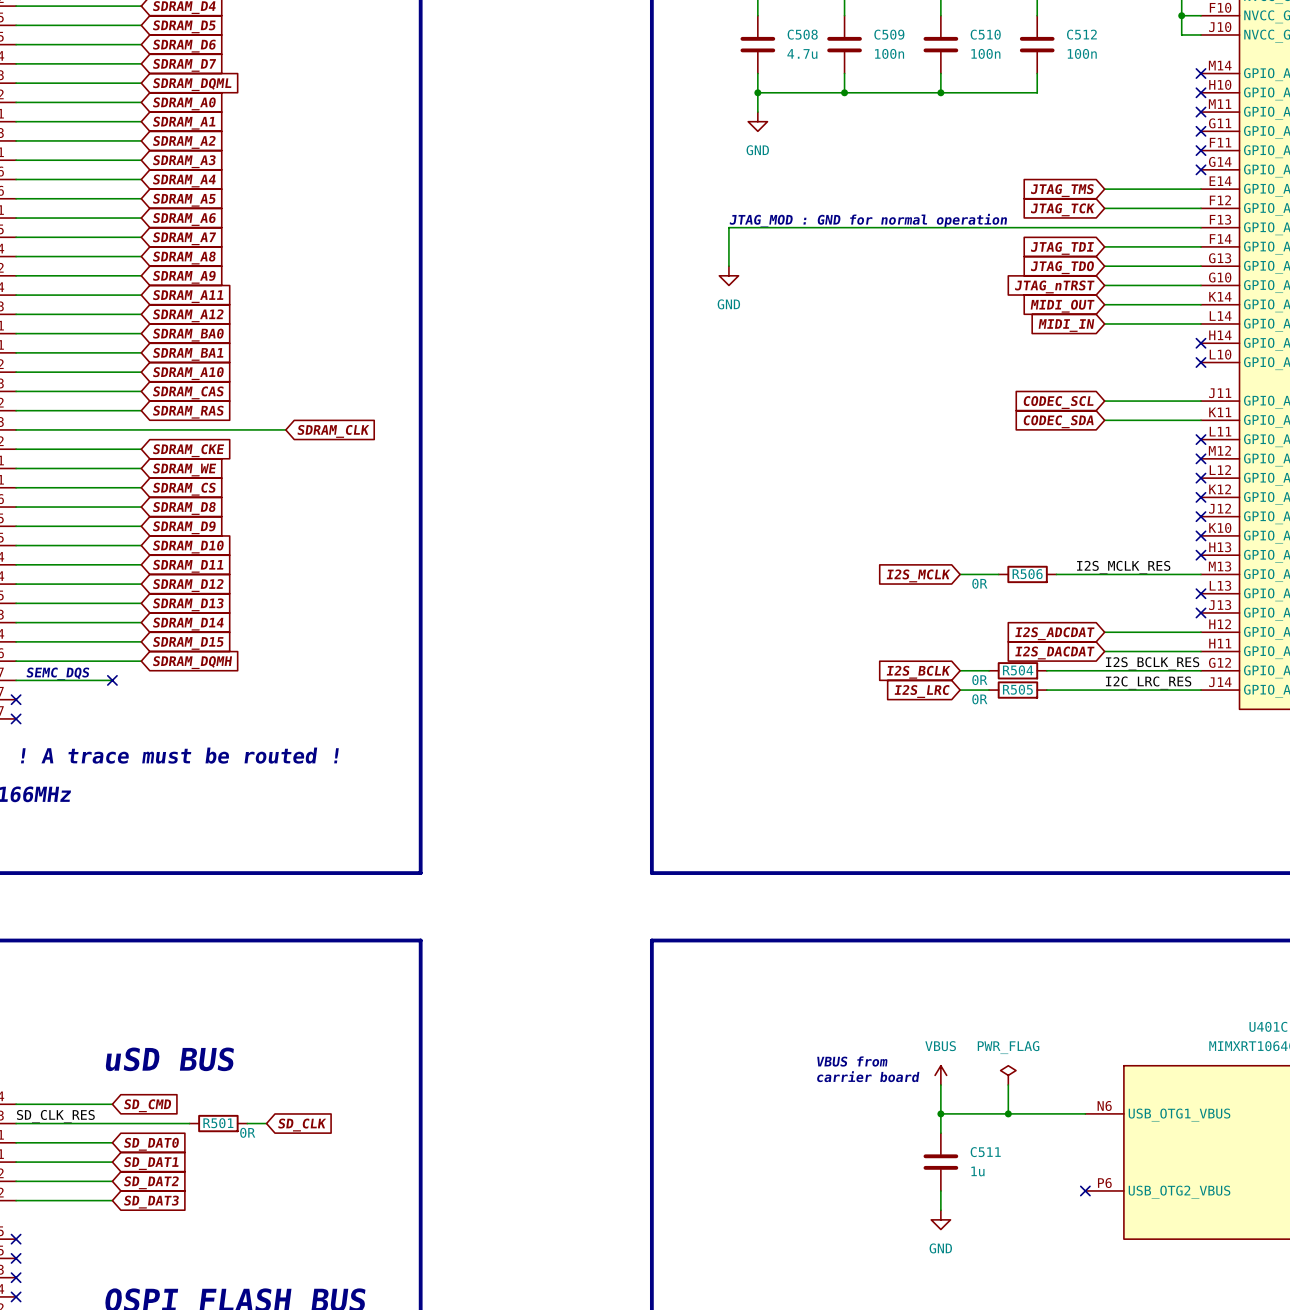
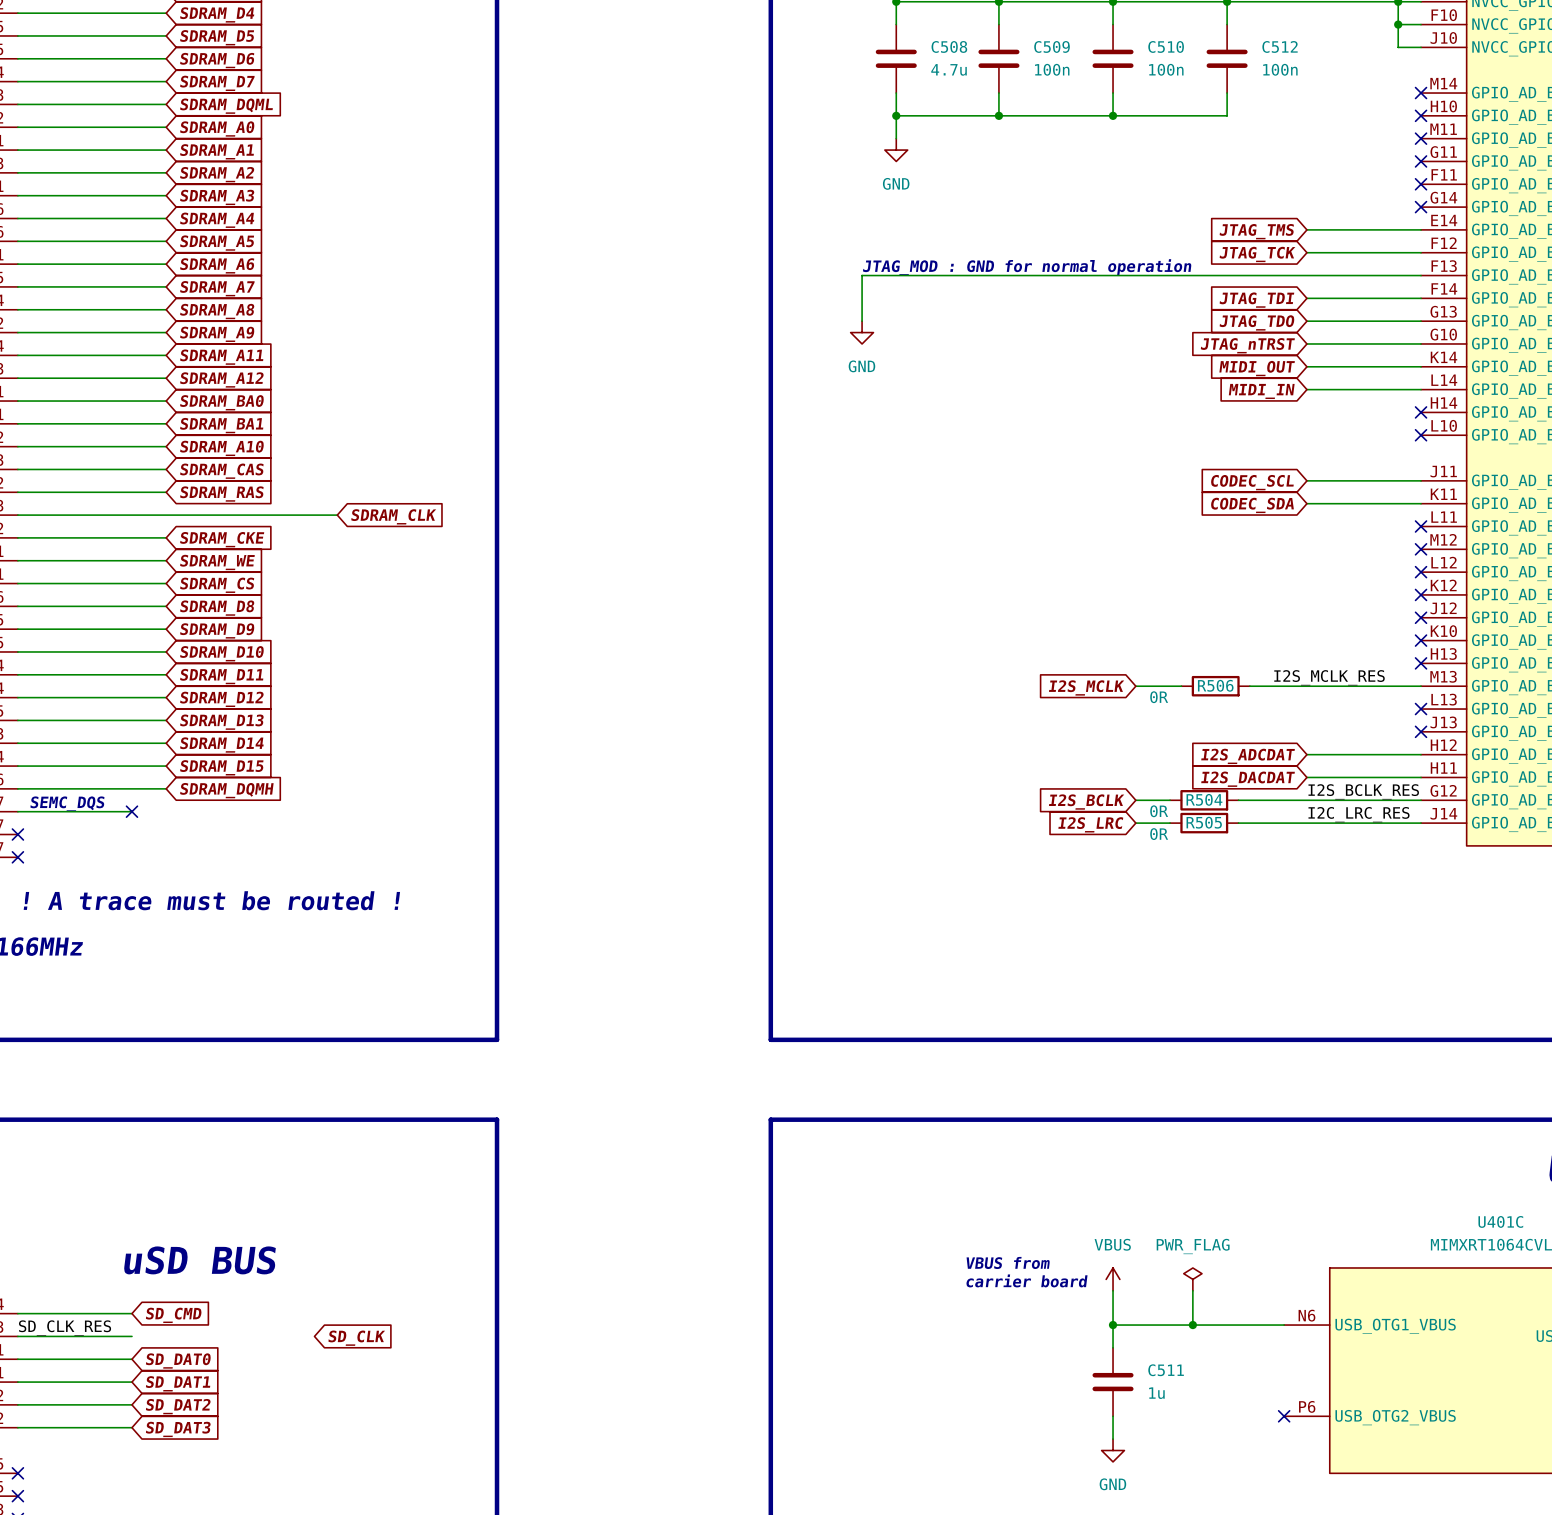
wire: (112, 1123) (189, 1123) -> none
R501: 0R (218, 1123) -> none
wire: (247, 1123) (266, 1123) -> none

